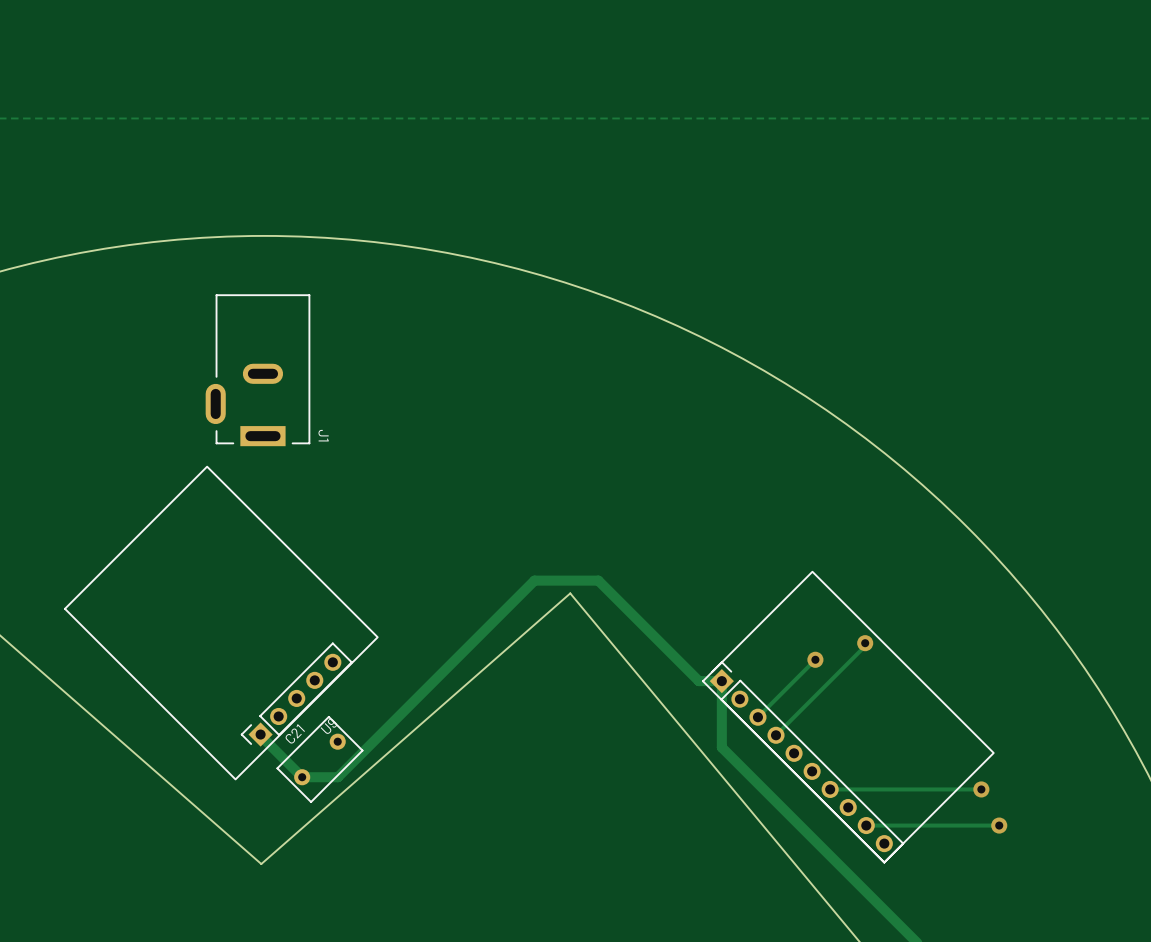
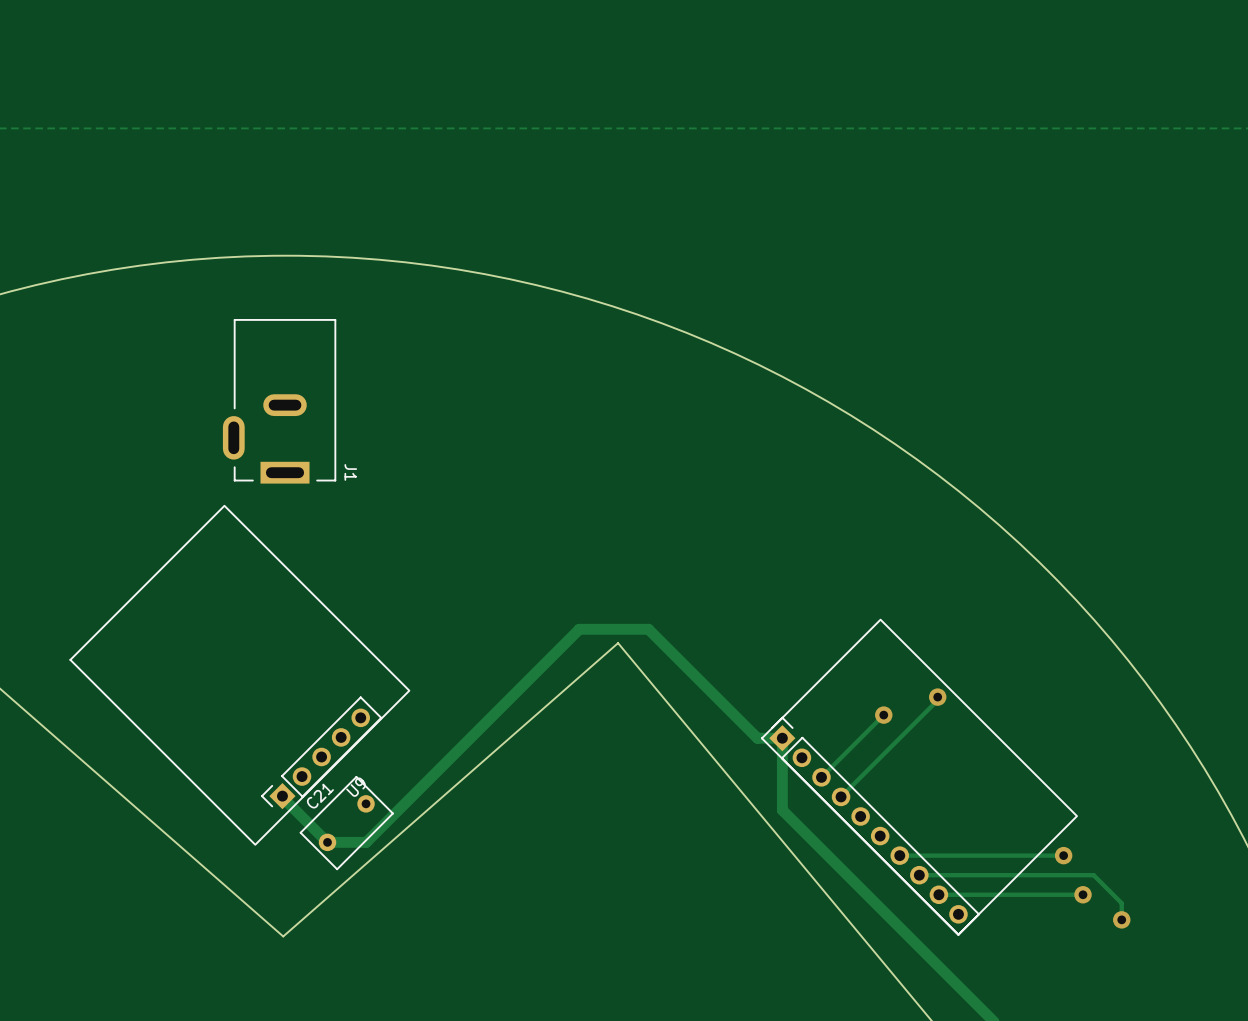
track: none -> (919, 875) (1093, 875) (1121, 903) (1121, 919)
via: none -> (1121, 919)

